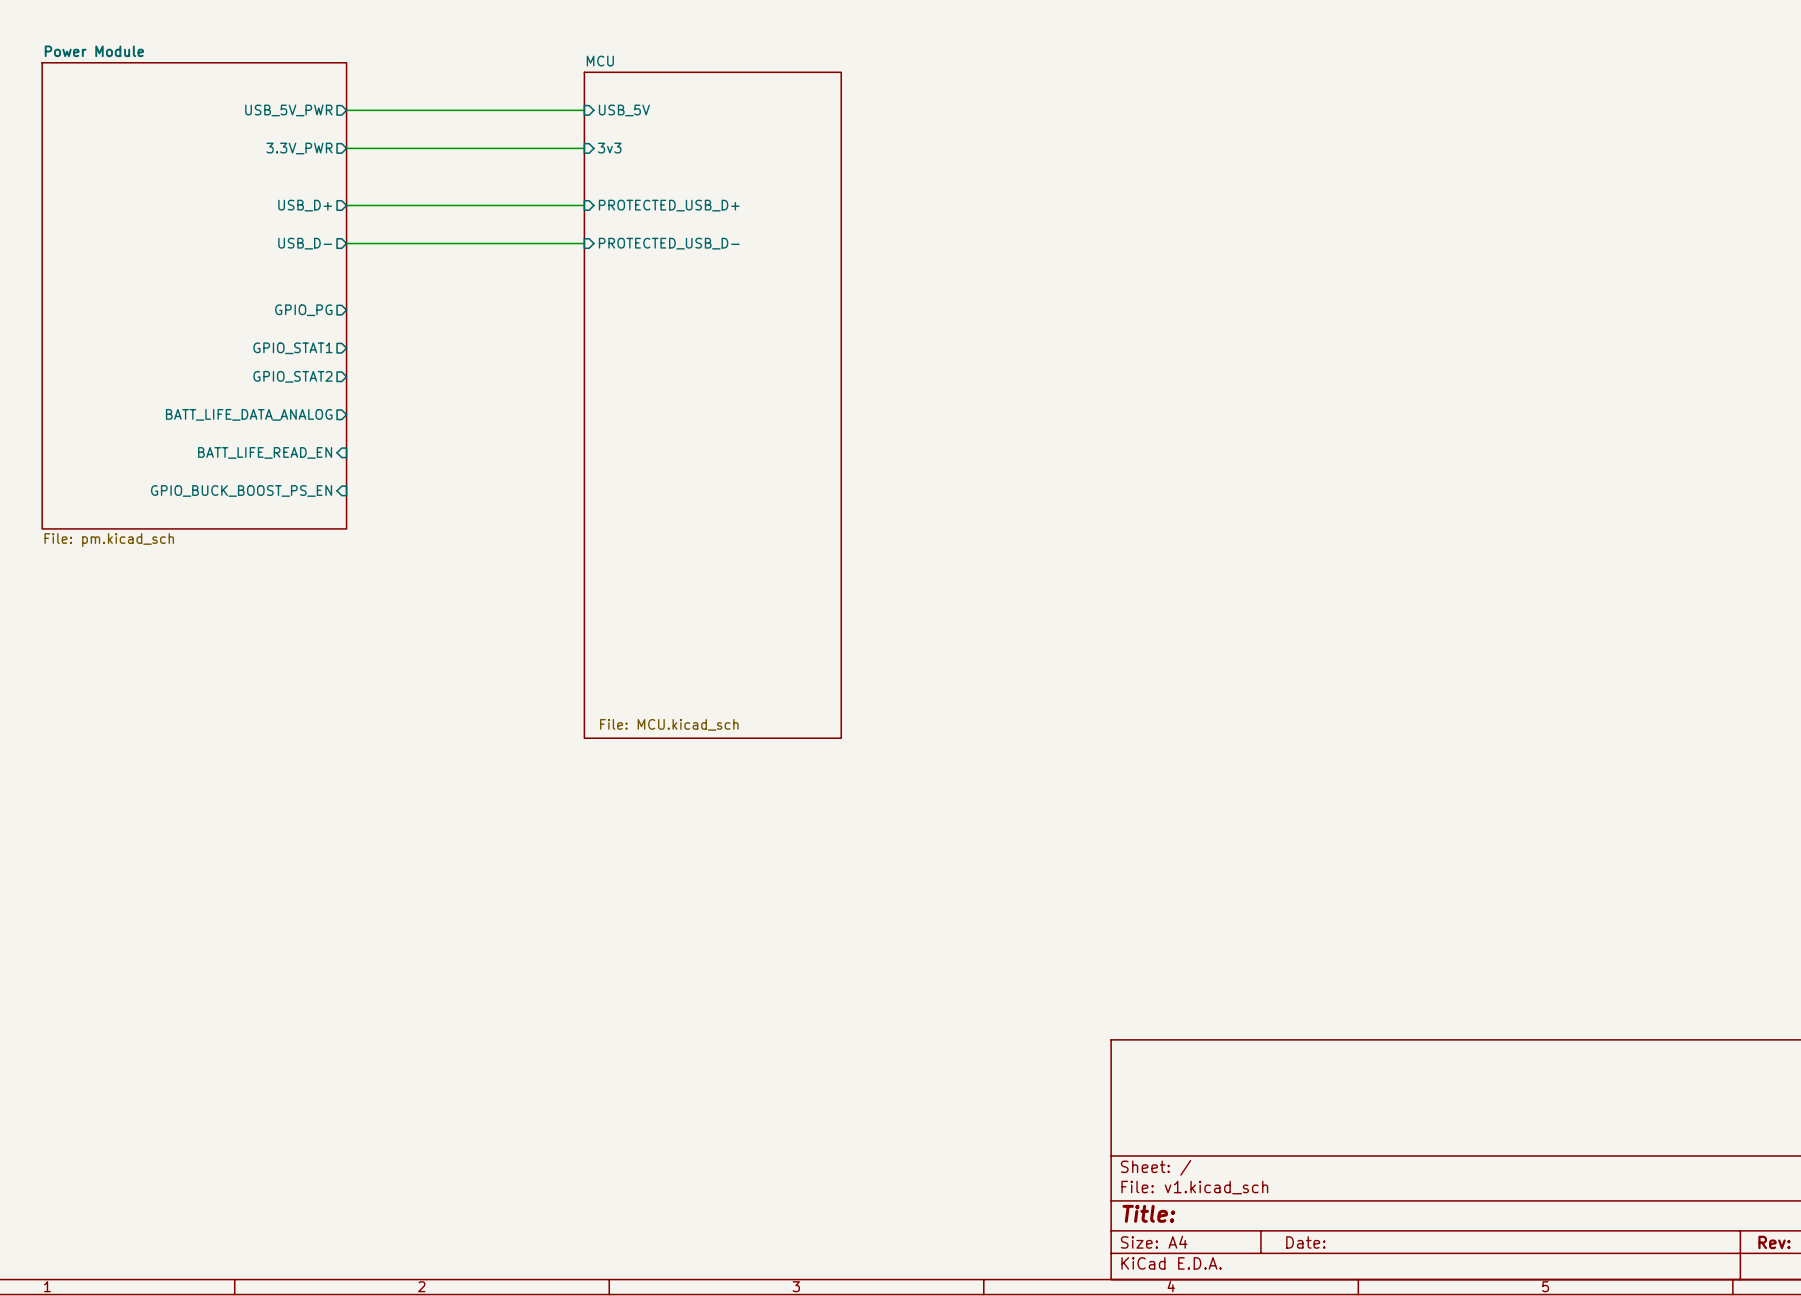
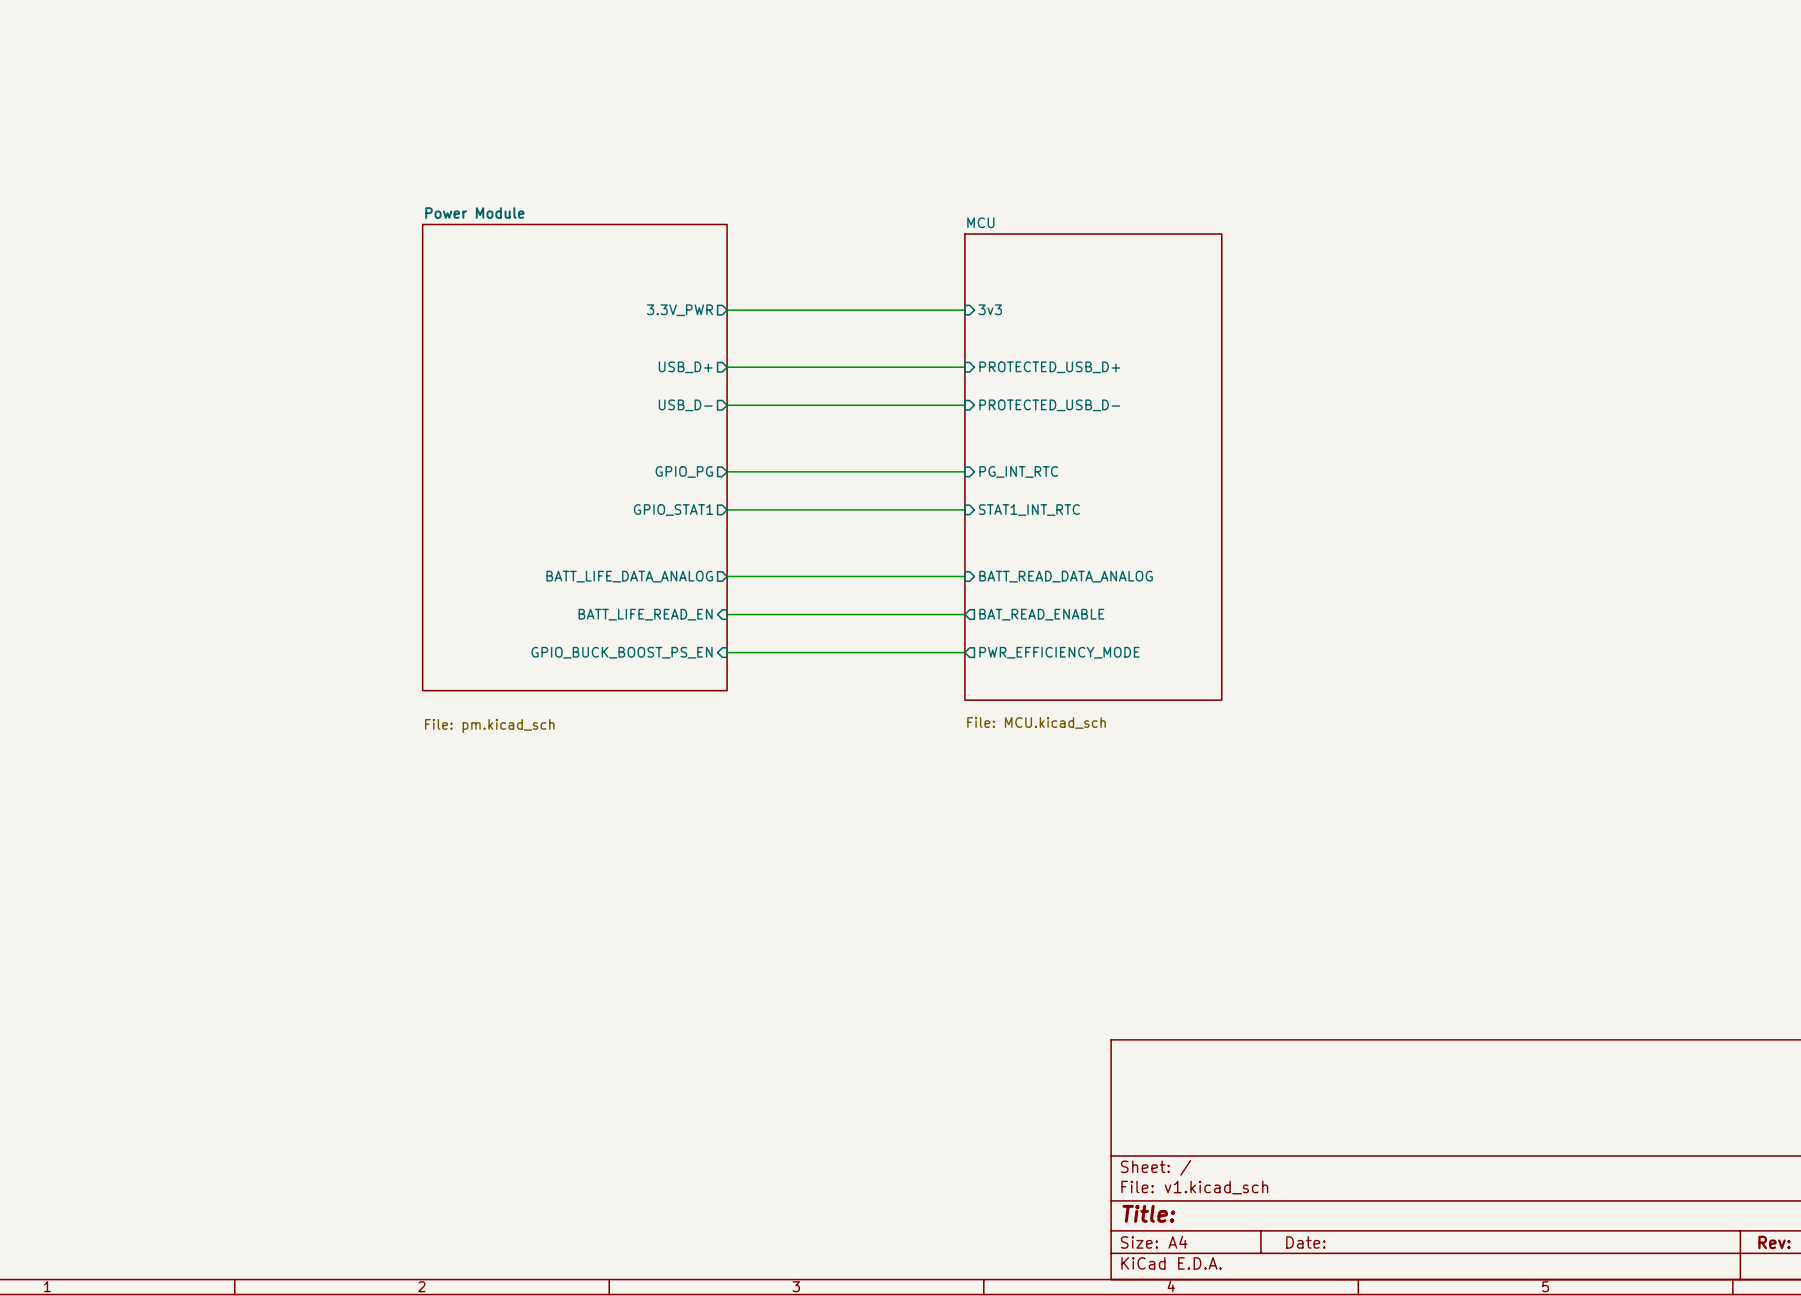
sheet pin: USB_5V_PWR (288, 110) -> none
wire: (346, 110) (584, 110) -> none
sheet pin: USB_5V (624, 110) -> none
sheet pin: 3.3V_PWR (299, 148) -> none
wire: (346, 148) (584, 148) -> none
sheet pin: 3v3 (609, 148) -> none
sheet pin: USB_D+ (305, 205) -> none
wire: (346, 205) (584, 205) -> none
sheet pin: PROTECTED_USB_D+ (669, 205) -> none
sheet pin: USB_D- (305, 243) -> none
wire: (346, 243) (584, 243) -> none
sheet pin: PROTECTED_USB_D- (669, 243) -> none
sheet Power Module: File: pm.kicad_sch (194, 295) -> none
sheet pin: none -> 3v3 (990, 309)
sheet pin: GPIO_PG (303, 310) -> none
sheet pin: none -> 3.3V_PWR (680, 310)
wire: none -> (727, 310) (964, 310)
sheet pin: GPIO_STAT1 (292, 348) -> none
sheet pin: none -> USB_D+ (685, 367)
wire: none -> (727, 367) (964, 367)
sheet pin: none -> PROTECTED_USB_D+ (1049, 367)
sheet pin: GPIO_STAT2 (292, 376) -> none
sheet pin: none -> USB_D- (685, 405)
sheet MCU: File: MCU.kicad_sch (712, 405) -> none
wire: none -> (727, 405) (964, 405)
sheet pin: none -> PROTECTED_USB_D- (1049, 405)
sheet pin: BATT_LIFE_DATA_ANALOG (249, 414) -> none
sheet pin: BATT_LIFE_READ_EN (265, 452) -> none
sheet Power Module: none -> File: pm.kicad_sch (574, 457)
sheet MCU: none -> File: MCU.kicad_sch (1093, 467)
sheet pin: none -> GPIO_PG (684, 471)
wire: none -> (727, 471) (964, 471)
sheet pin: none -> PG_INT_RTC (1018, 471)
sheet pin: GPIO_BUCK_BOOST_PS_EN (241, 490) -> none
wire: none -> (727, 509) (964, 509)
sheet pin: none -> GPIO_STAT1 (673, 510)
sheet pin: none -> STAT1_INT_RTC (1029, 510)
sheet pin: none -> BATT_LIFE_DATA_ANALOG (629, 576)
wire: none -> (727, 576) (964, 576)
sheet pin: none -> BATT_READ_DATA_ANALOG (1066, 576)
sheet pin: none -> BATT_LIFE_READ_EN (645, 614)
wire: none -> (727, 614) (964, 614)
sheet pin: none -> BAT_READ_ENABLE (1041, 614)
sheet pin: none -> GPIO_BUCK_BOOST_PS_EN (622, 652)
wire: none -> (727, 652) (964, 652)
sheet pin: none -> PWR_EFFICIENCY_MODE (1059, 652)

